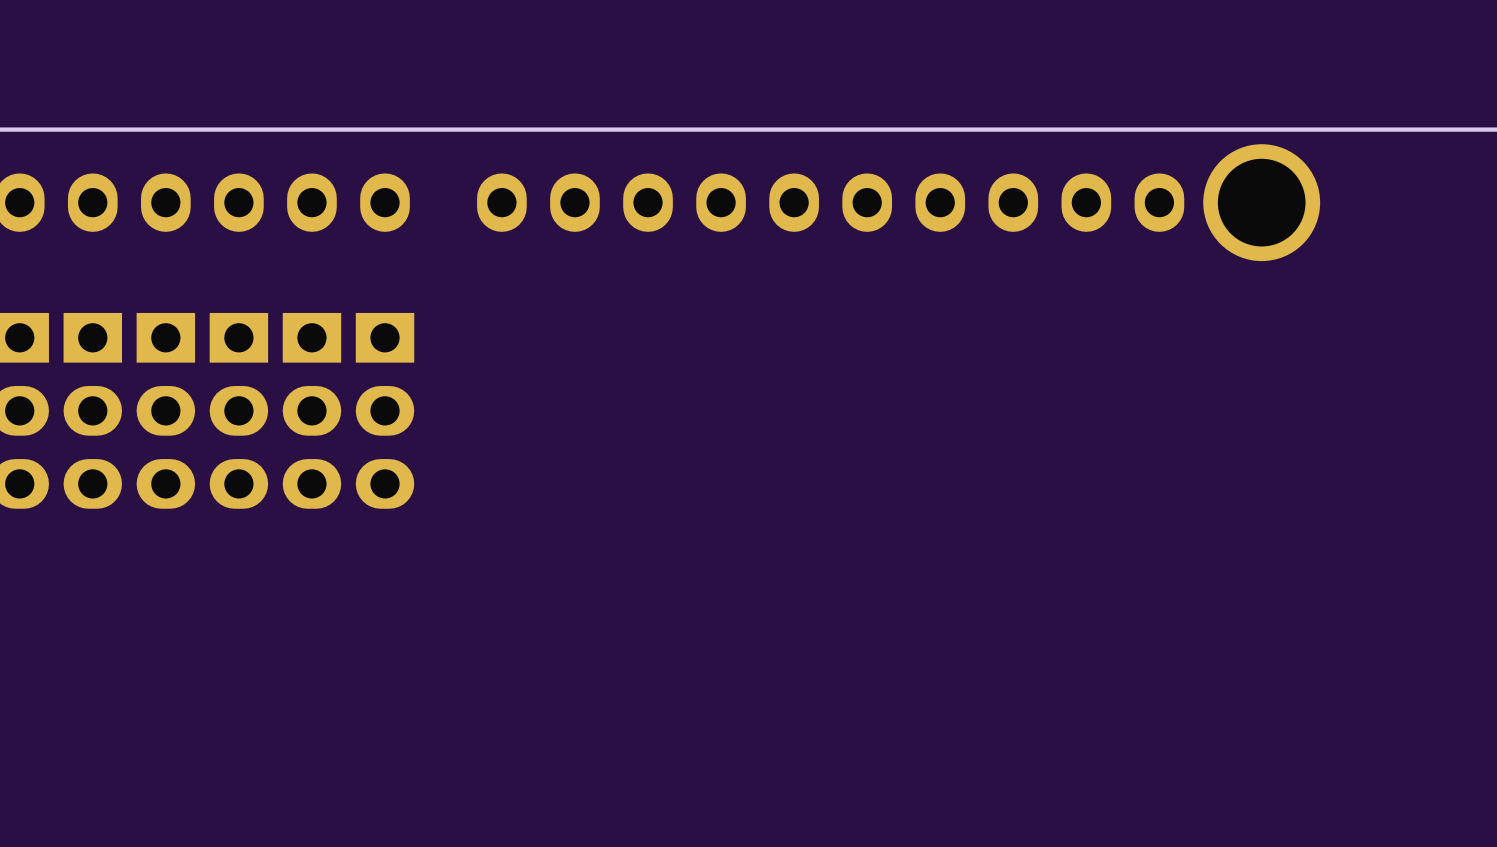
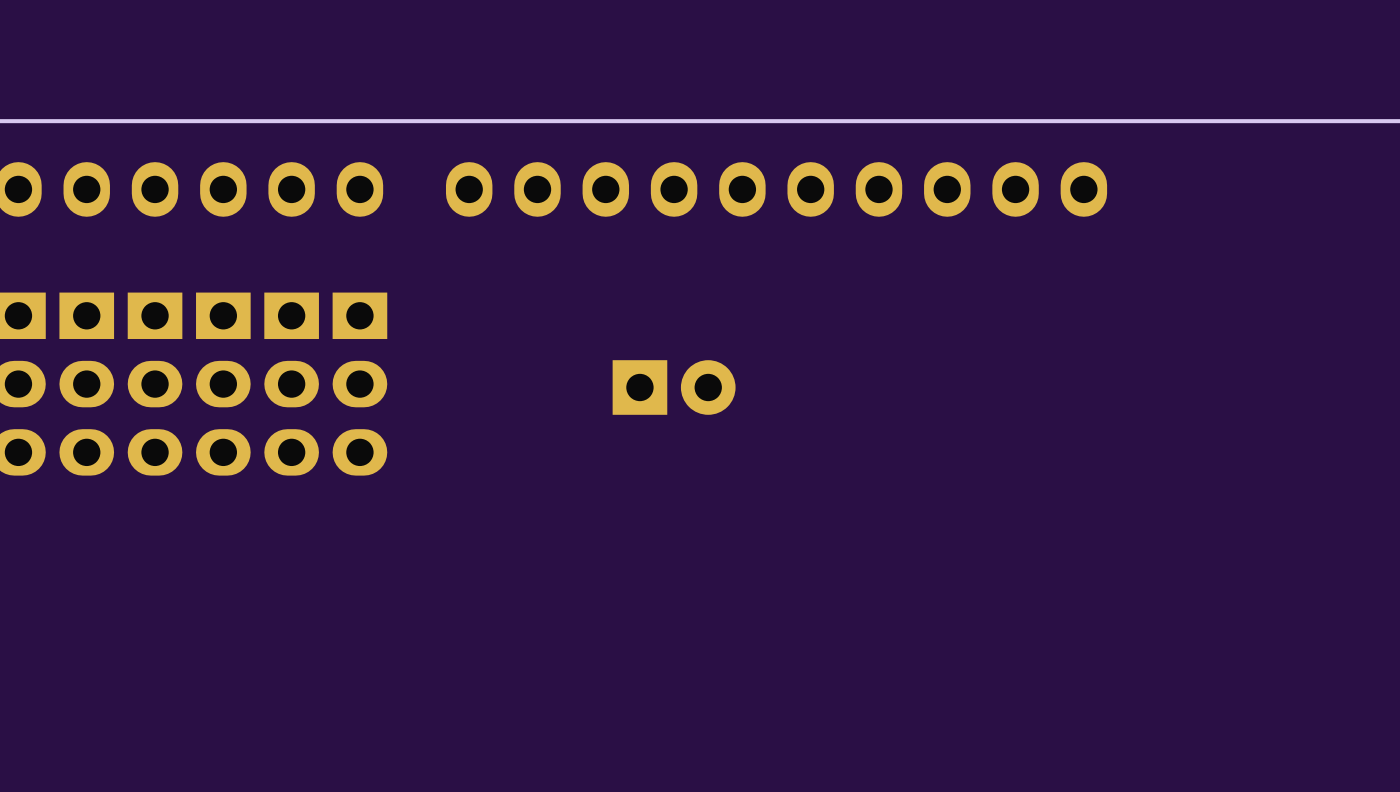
part: (1261, 202) -> none
part: none -> (674, 387)

